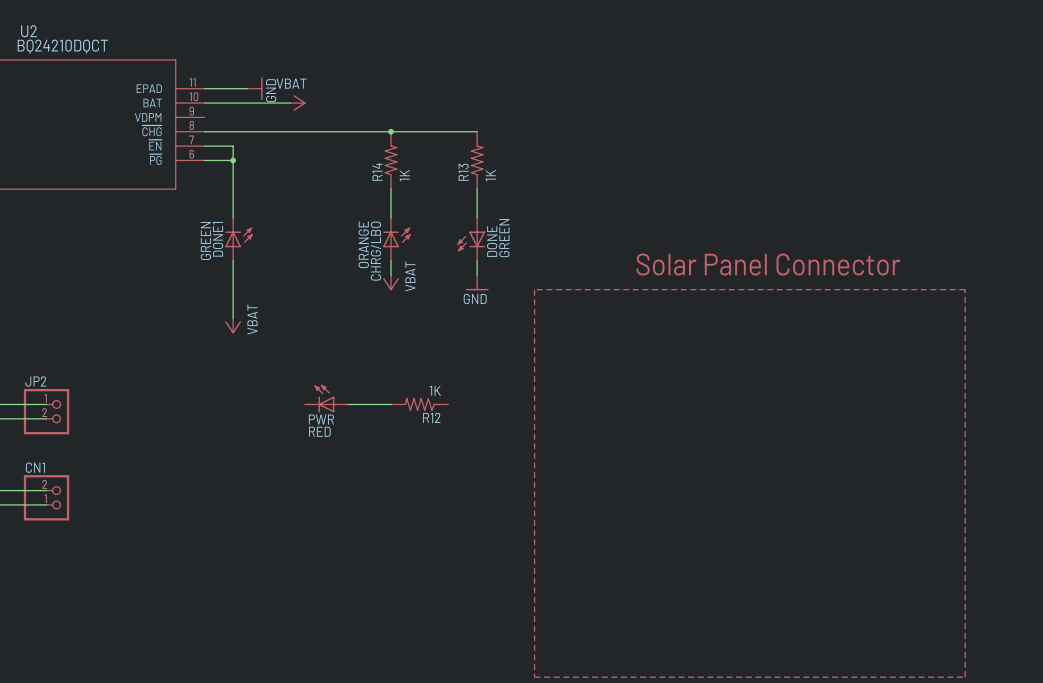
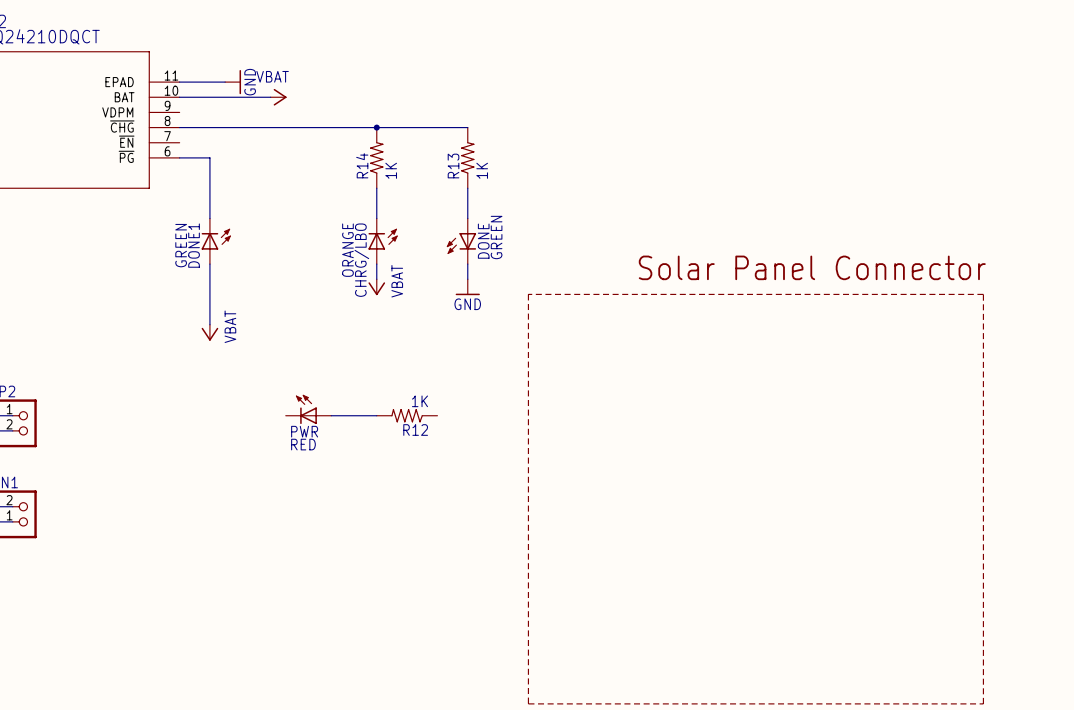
wire: (204, 146) (233, 146) (233, 160) -> none
junction: (233, 160) -> none

